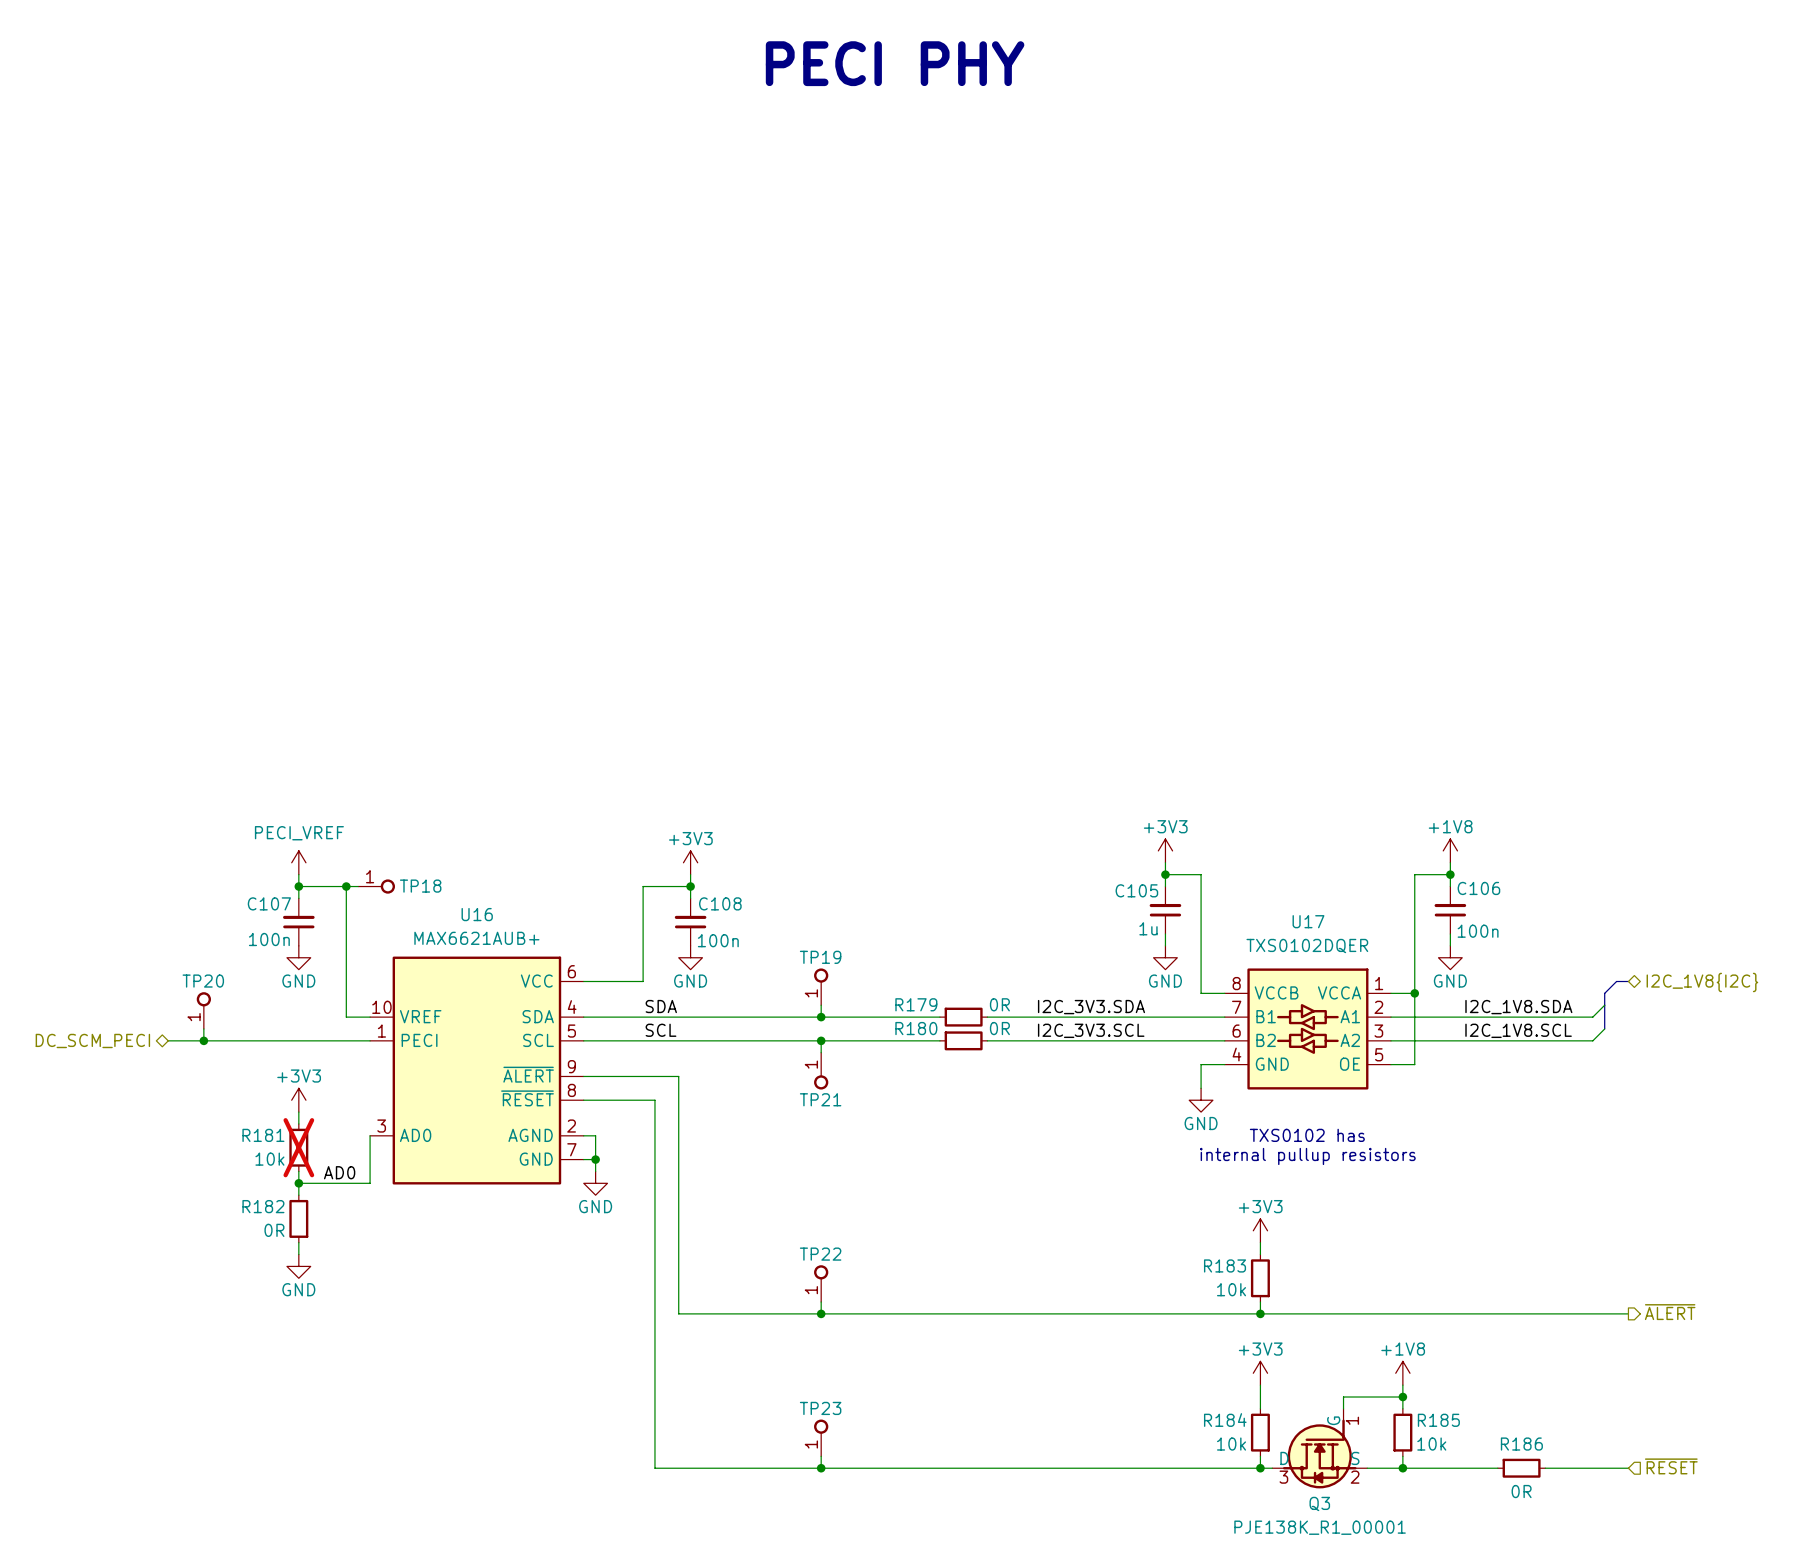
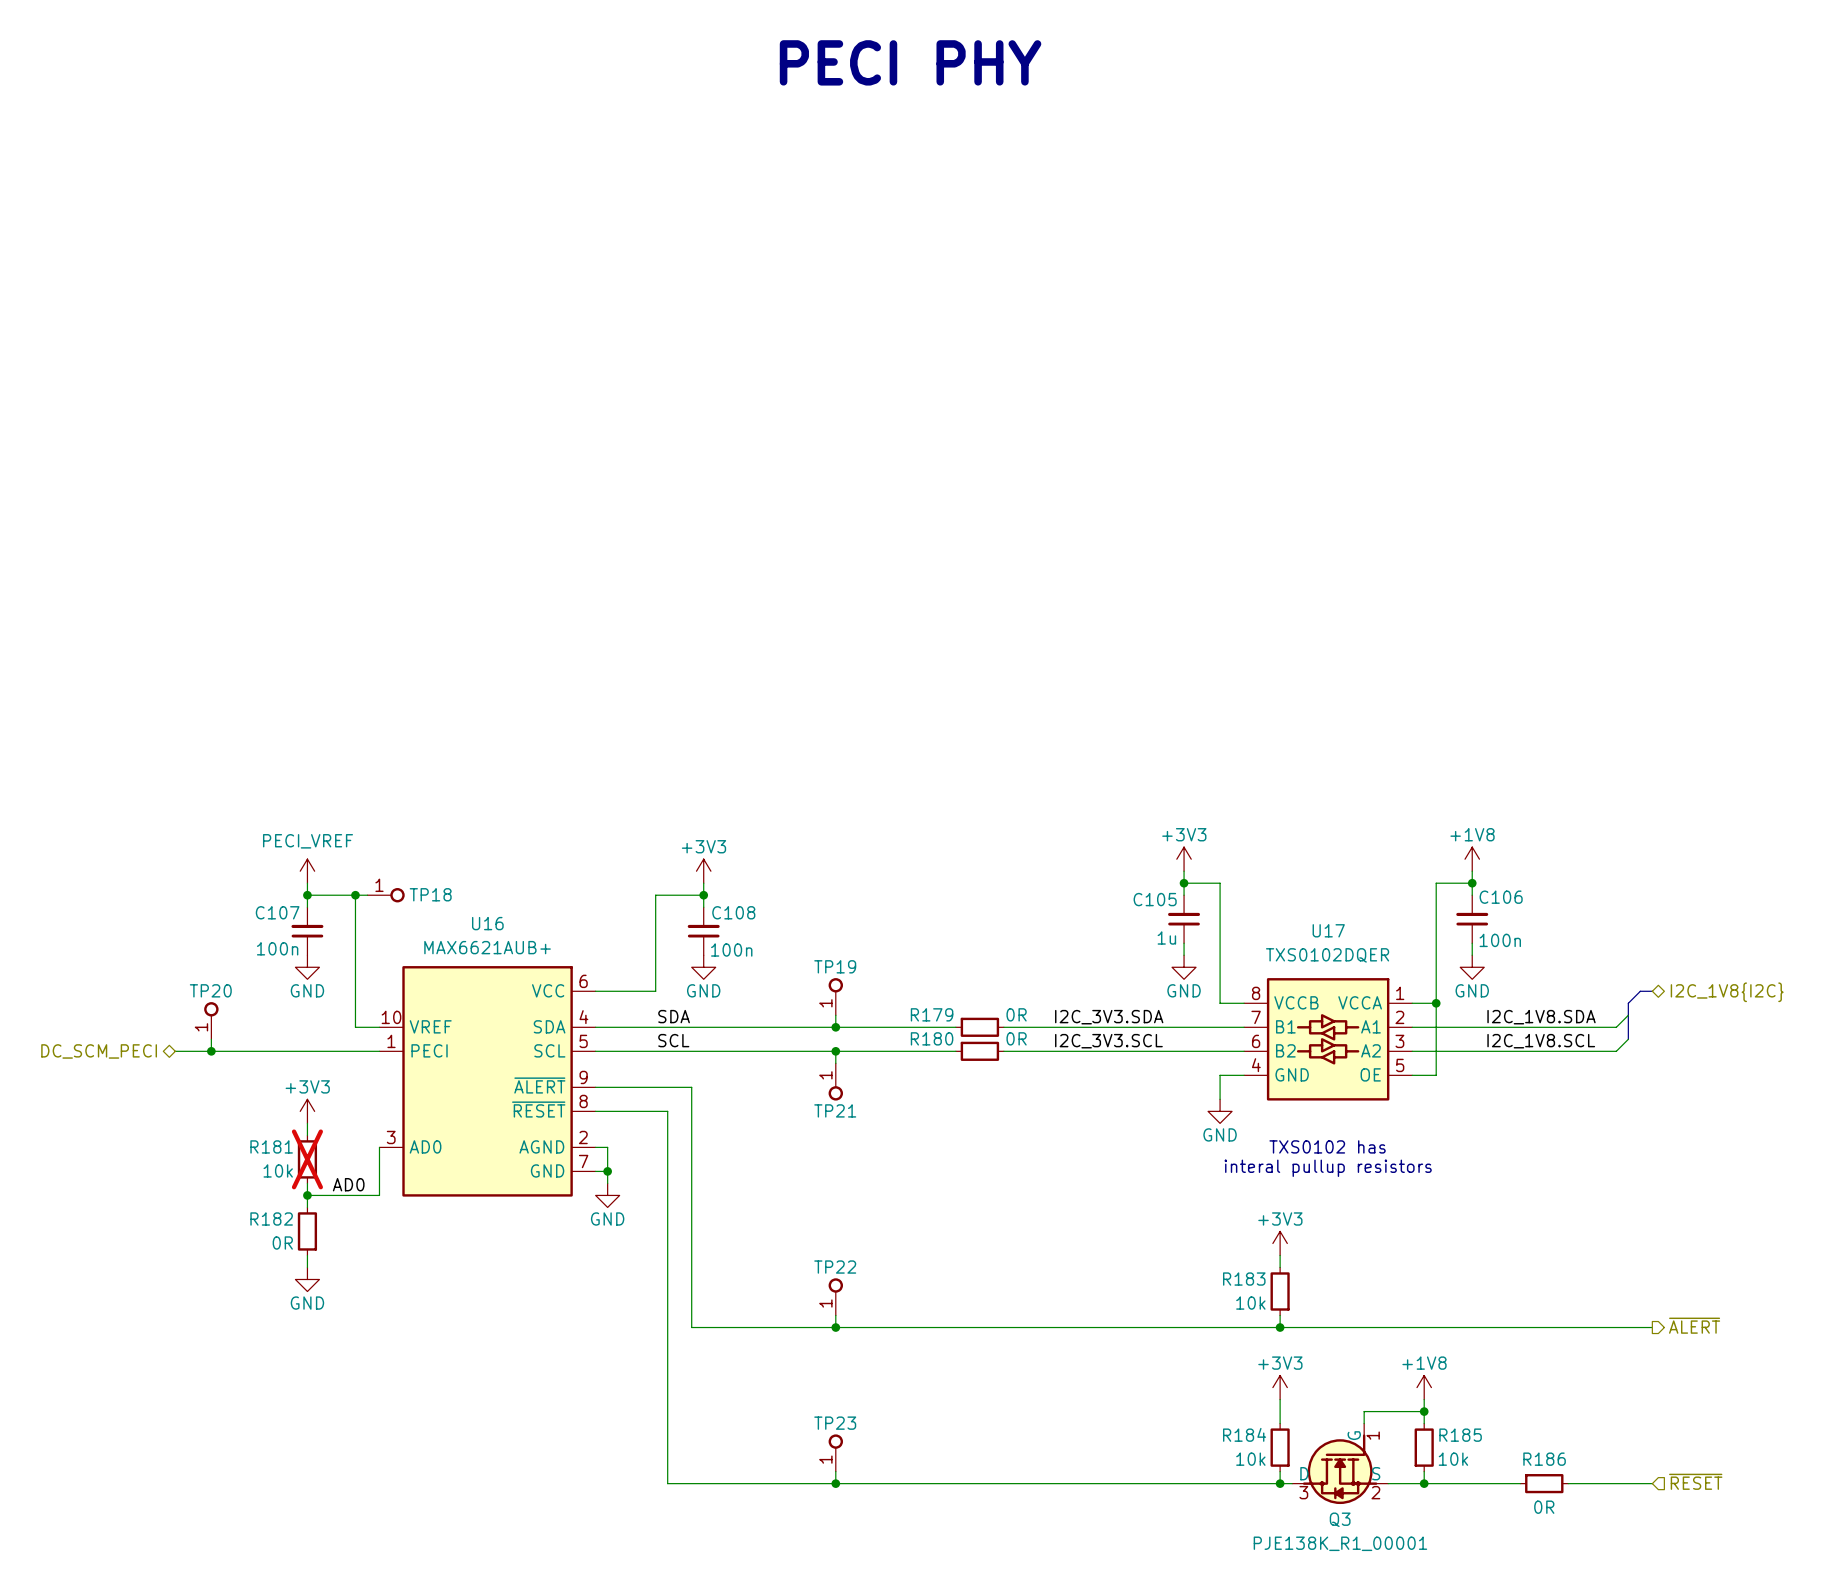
text: internal pullup resistors (1307, 1156) -> interal pullup resistors (1328, 1168)

